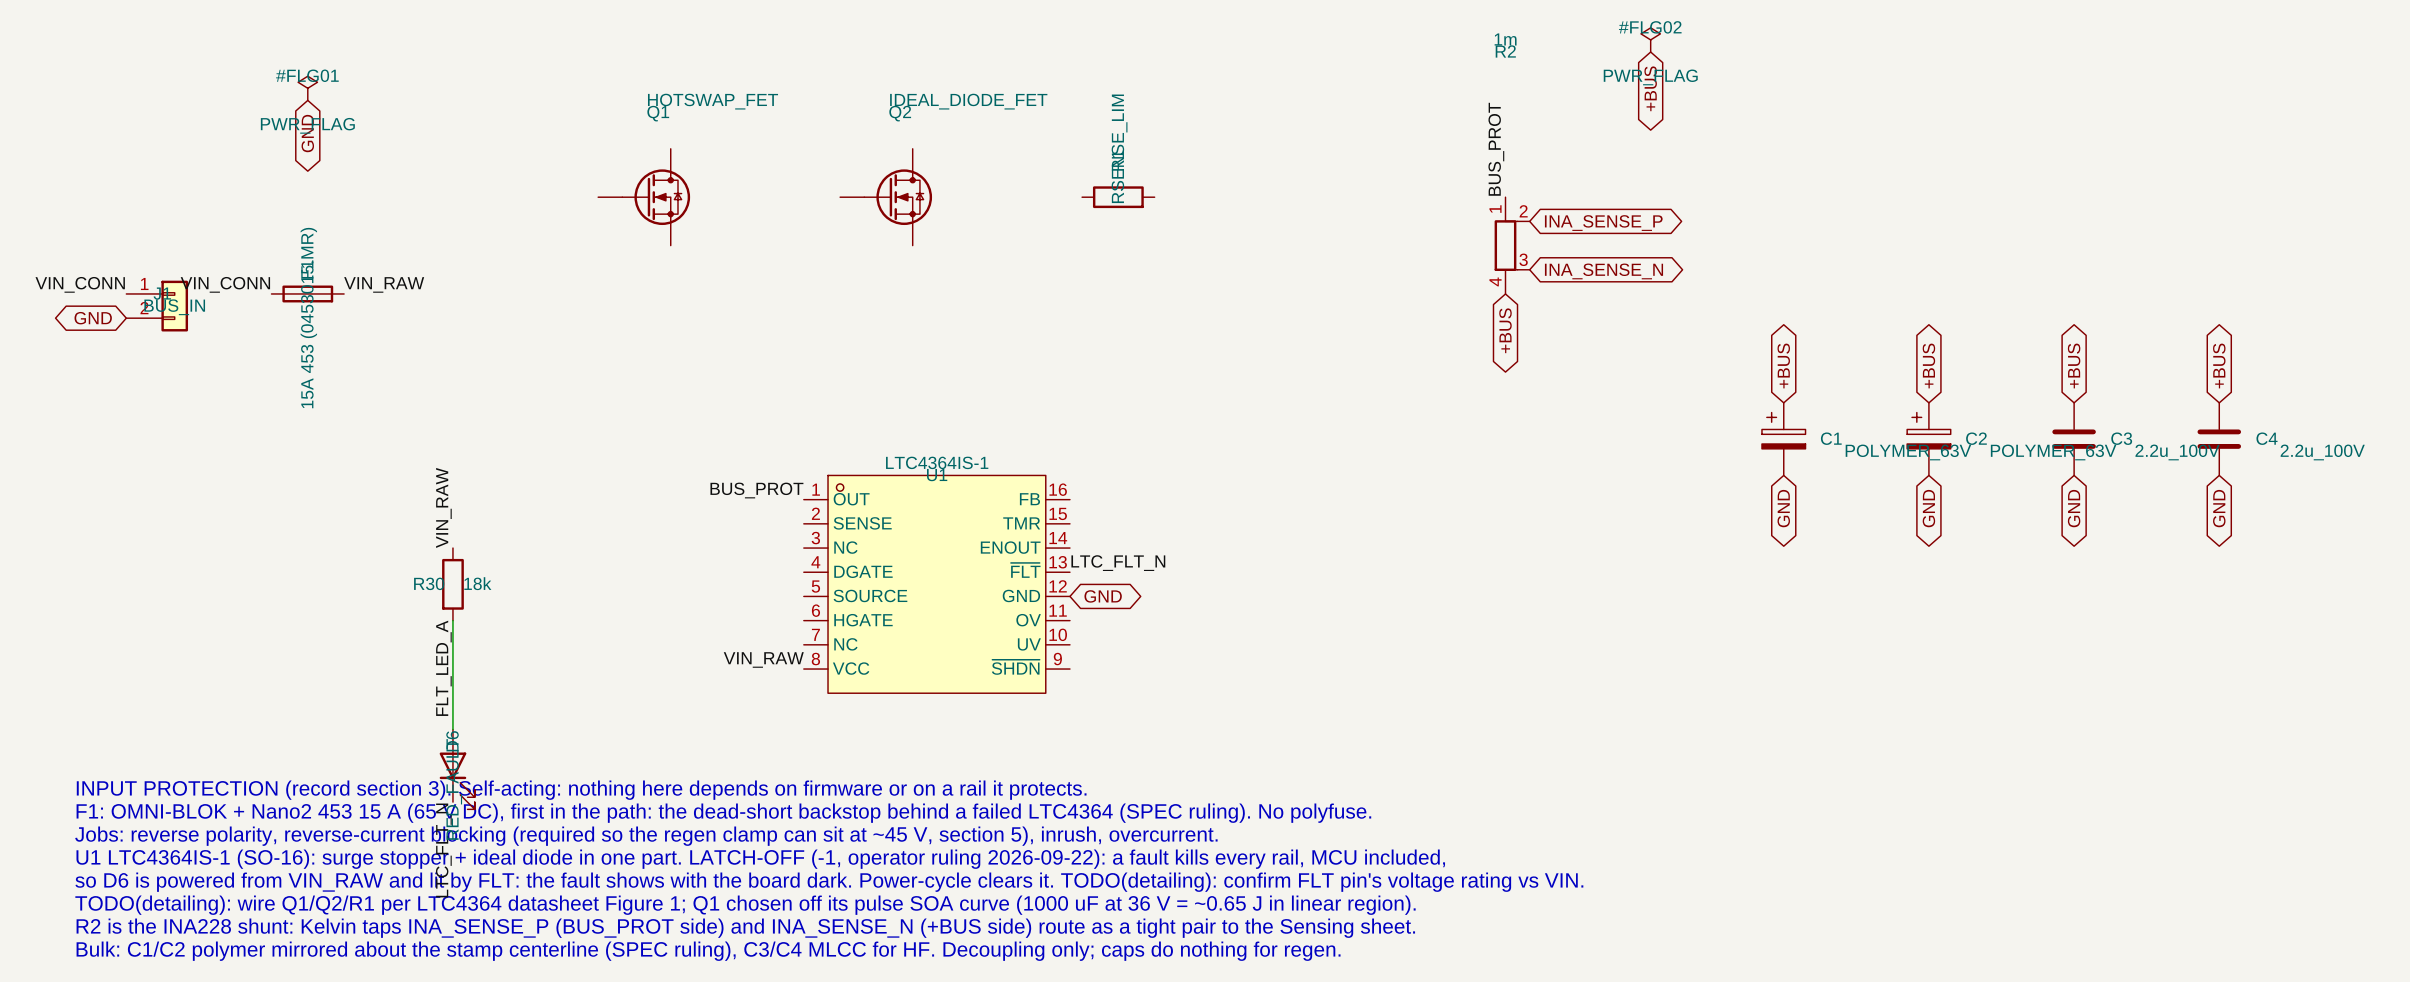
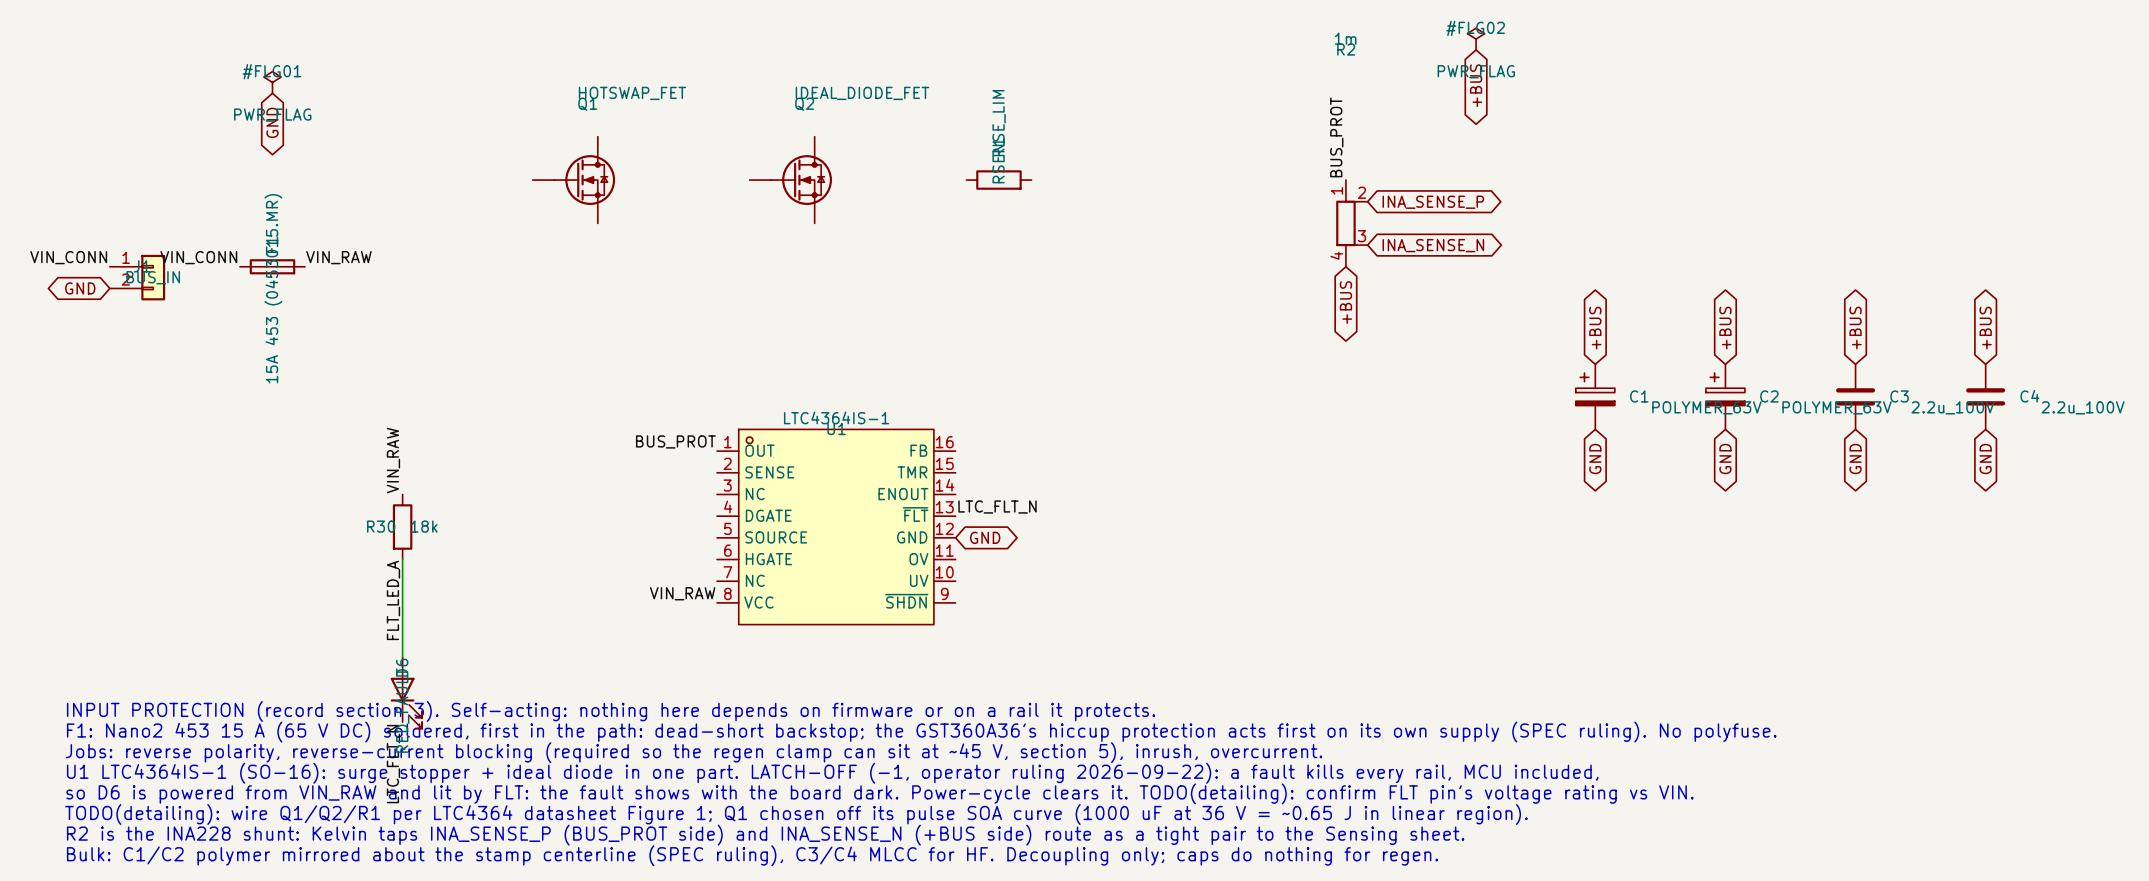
text: F1: OMNI-BLOK + Nano2 453 15 A (65 V DC), first in the path: the dead-short backstop behind a failed LTC4364 (SPEC ruling). No polyfuse. (723, 813) -> F1: Nano2 453 15 A (65 V DC) soldered, first in the path: dead-short backstop; the GST360A36's hiccup protection acts first on its own supply (SPEC ruling). No polyfuse. (921, 732)

